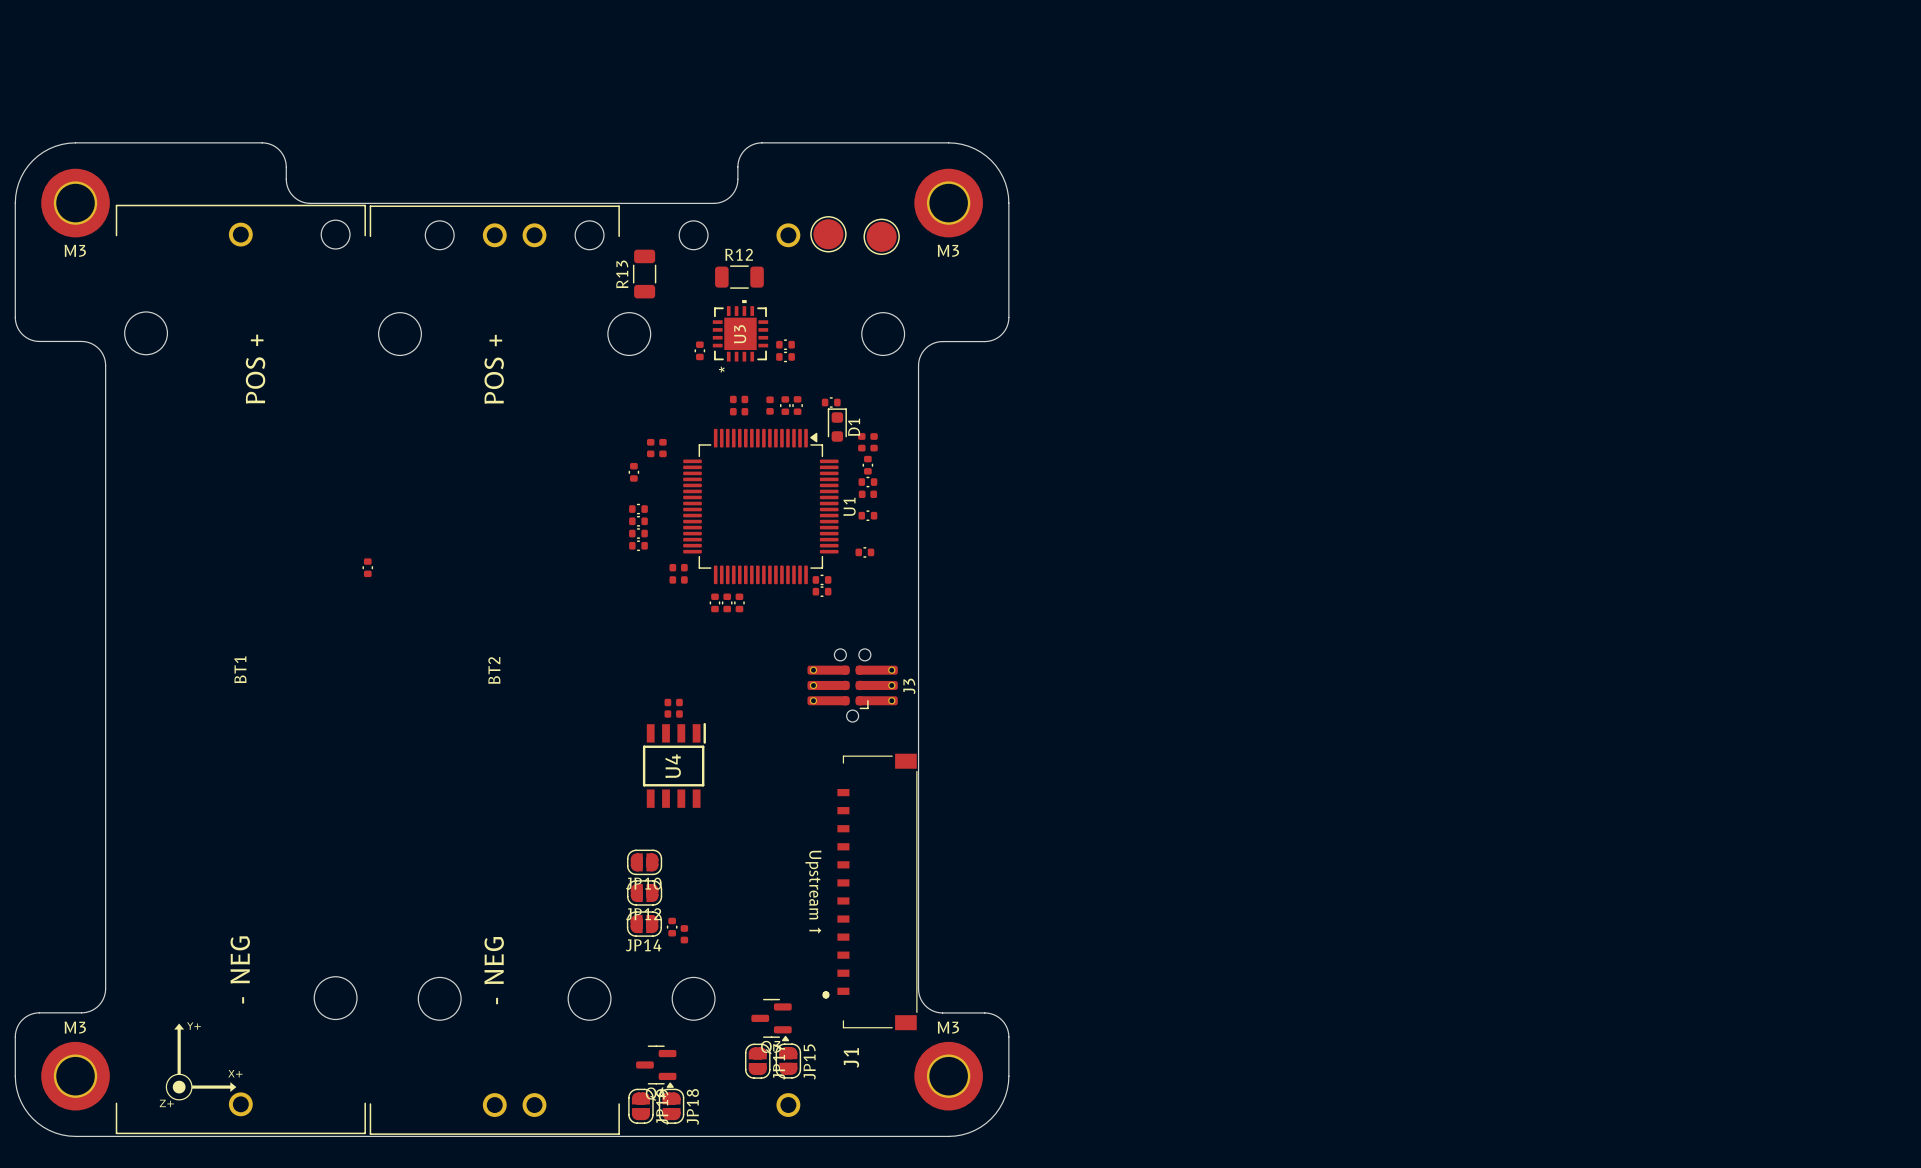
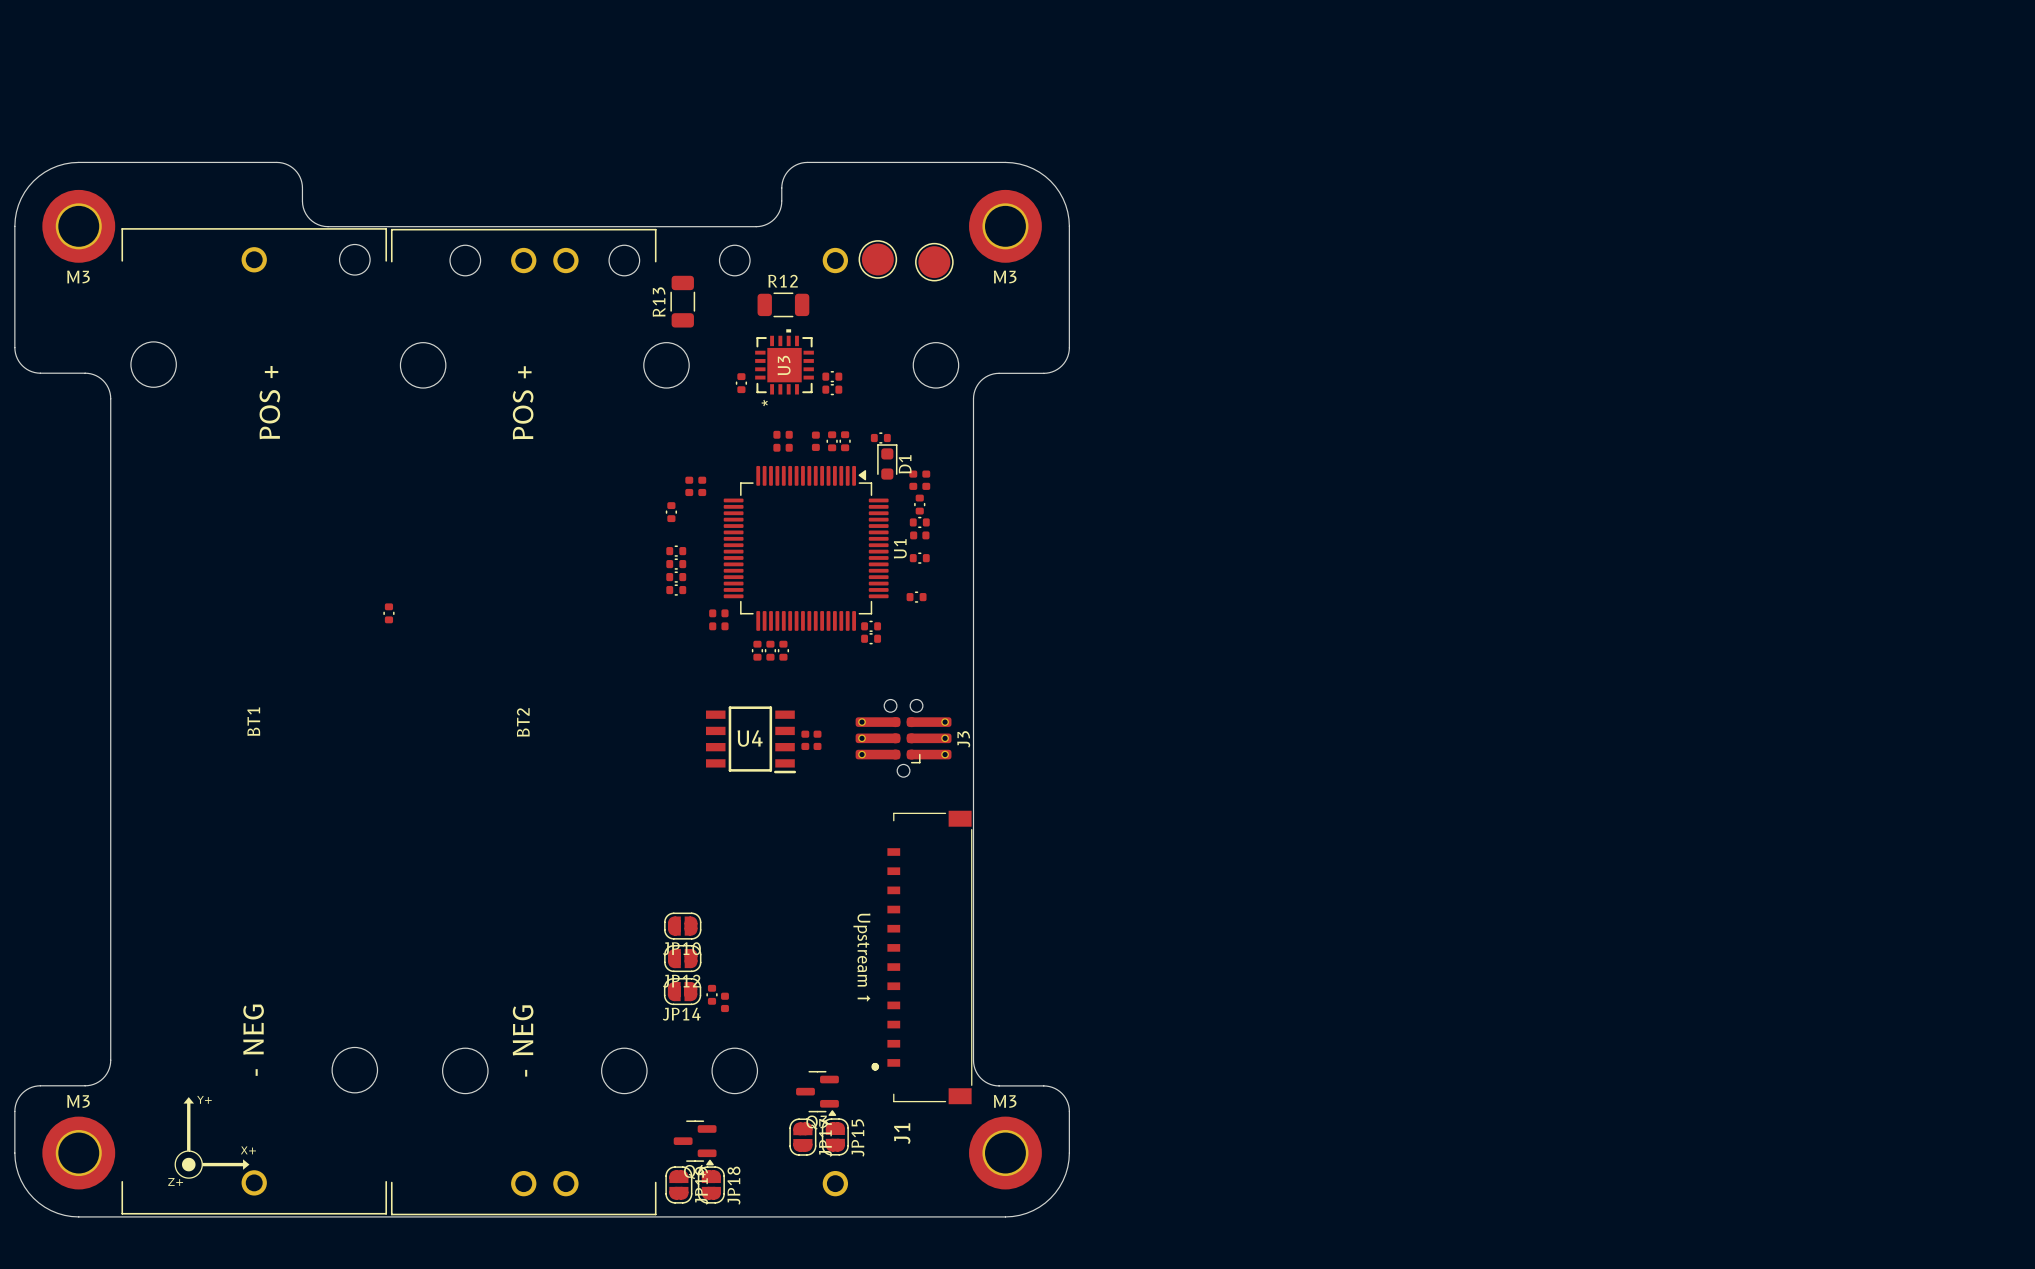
part: none -> (805, 740)
part: none -> (817, 740)
part: (673, 702) -> none
part: (673, 714) -> none
U4 rotation: 0° (674, 765) -> 90° clockwise (751, 739)
U4 position: (674, 765) -> (751, 739)

